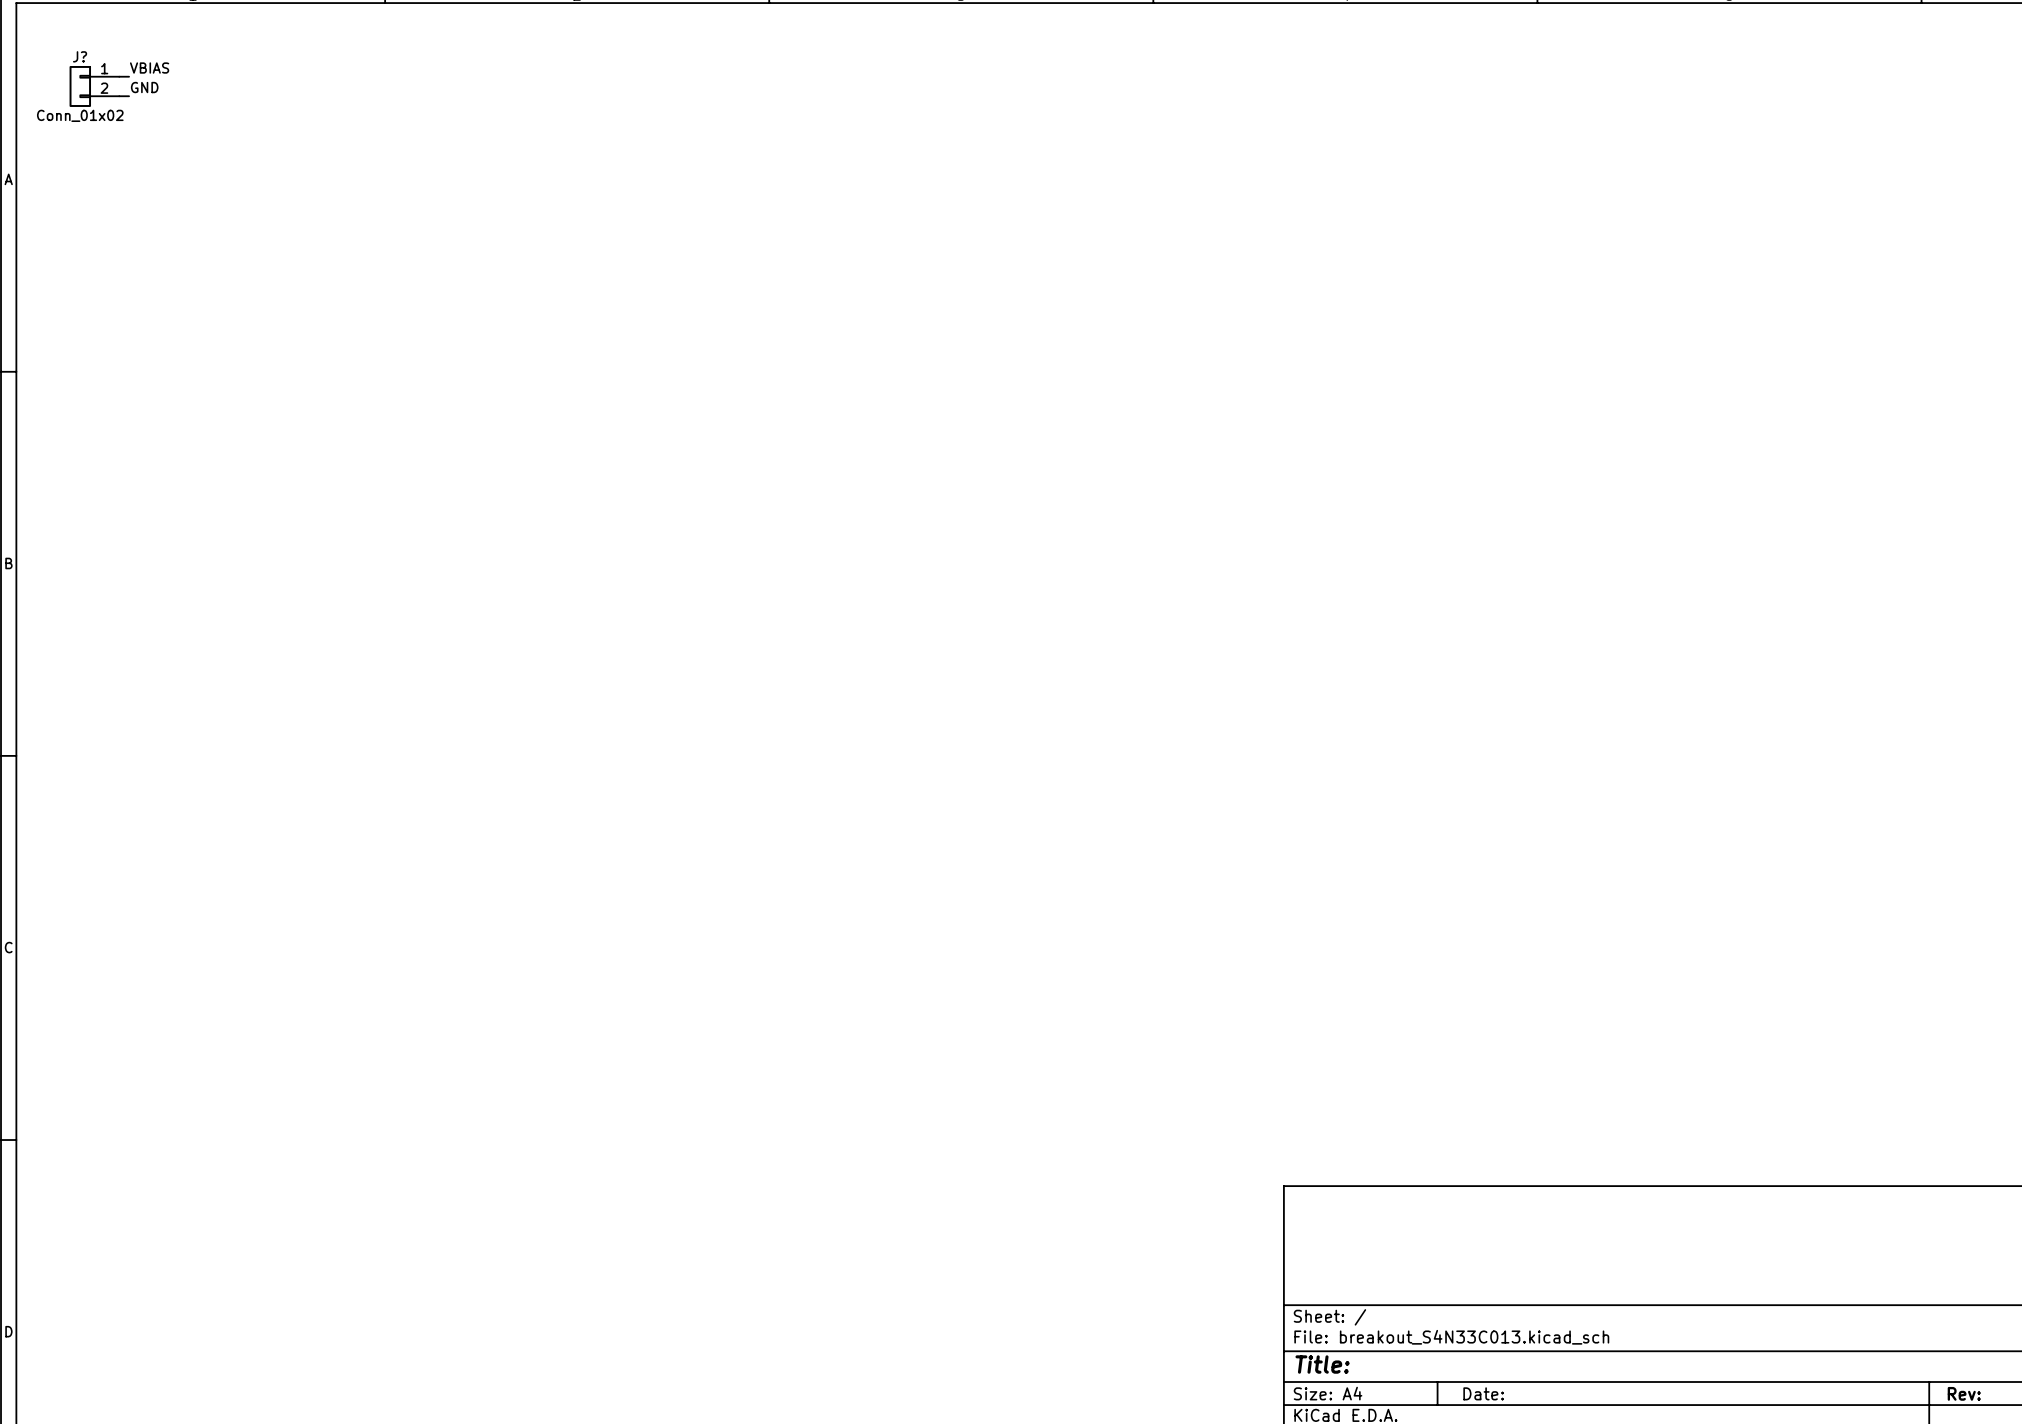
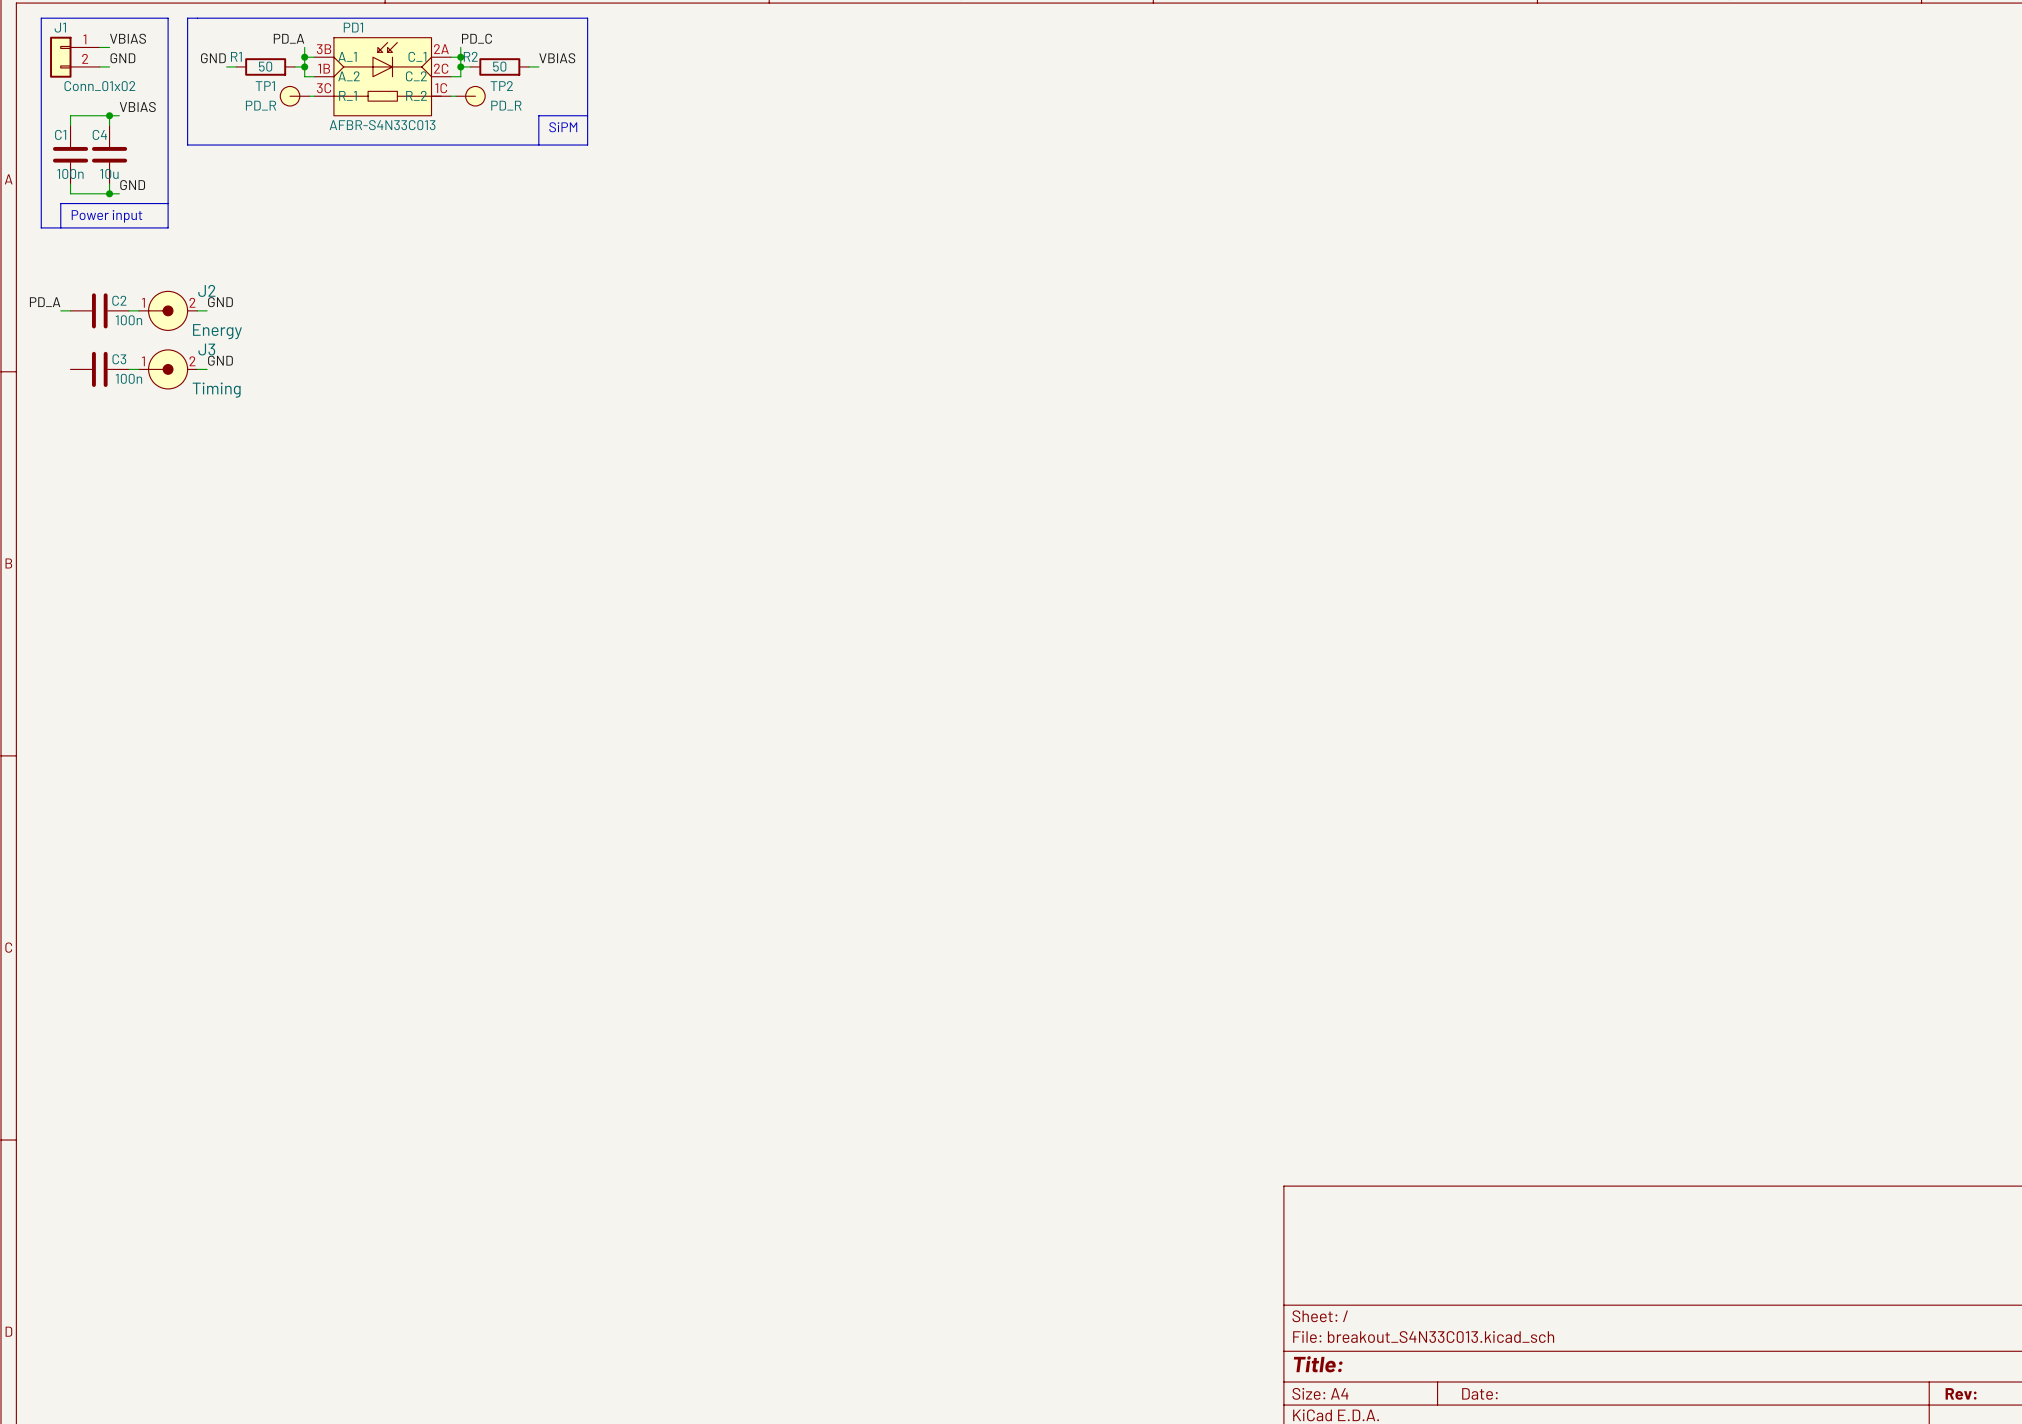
line: none -> (41, 18) (168, 18) (168, 227) (41, 227) (41, 18)
line: none -> (187, 18) (587, 18) (587, 145) (187, 145) (187, 18)
label: none -> VBIAS (128, 38)
label: none -> PD_A (289, 38)
label: none -> PD_C (476, 38)
wire: none -> (304, 47) (304, 76) (314, 76)
wire: none -> (460, 47) (460, 76) (451, 76)
J1: none -> Conn_01x02 (74, 57)
wire: none -> (304, 57) (314, 57)
junction: none -> (304, 57)
wire: none -> (451, 57) (460, 57)
junction: none -> (460, 57)
label: none -> GND (213, 58)
label: none -> VBIAS (557, 58)
wire: none -> (226, 66) (236, 66)
R1: none -> 50 (265, 66)
wire: none -> (294, 66) (304, 66)
junction: none -> (304, 66)
wire: none -> (460, 66) (470, 66)
junction: none -> (460, 66)
R2: none -> 50 (499, 66)
wire: none -> (529, 66) (538, 66)
label: VBIAS (149, 68) -> none
wire: (119, 76) (129, 76) -> (99, 47) (109, 47)
PD1: none -> AFBR-S4N33C013 (382, 76)
J?: Conn_01x02 (94, 86) -> none
label position: GND (144, 87) -> GND (122, 58)
wire: (119, 96) (129, 96) -> (99, 66) (109, 66)
TP1: none -> PD_R (294, 96)
wire: none -> (309, 96) (314, 96)
wire: none -> (451, 96) (455, 96)
TP2: none -> PD_R (470, 96)
label: none -> VBIAS (137, 107)
wire: none -> (109, 115) (109, 125)
junction: none -> (109, 115)
wire: none -> (119, 115) (70, 115) (70, 125)
line: none -> (587, 115) (538, 115) (538, 145)
text: none -> SiPM (563, 127)
C1: none -> 100n (70, 154)
C4: none -> 10u (109, 154)
wire: none -> (70, 184) (70, 193) (119, 193)
wire: none -> (109, 184) (109, 193)
label: none -> GND (132, 185)
junction: none -> (109, 193)
line: none -> (168, 203) (60, 203) (60, 227)
text: none -> Power input (106, 216)
label: none -> PD_A (45, 302)
label: none -> GND (220, 302)
wire: none -> (60, 310) (70, 310)
C2: none -> 100n (99, 310)
wire: none -> (129, 310) (138, 310)
J2: none -> Energy (168, 310)
wire: none -> (197, 310) (207, 310)
label: none -> GND (220, 360)
C3: none -> 100n (99, 369)
wire: none -> (129, 369) (138, 369)
J3: none -> Timing (168, 369)
wire: none -> (197, 369) (207, 369)

